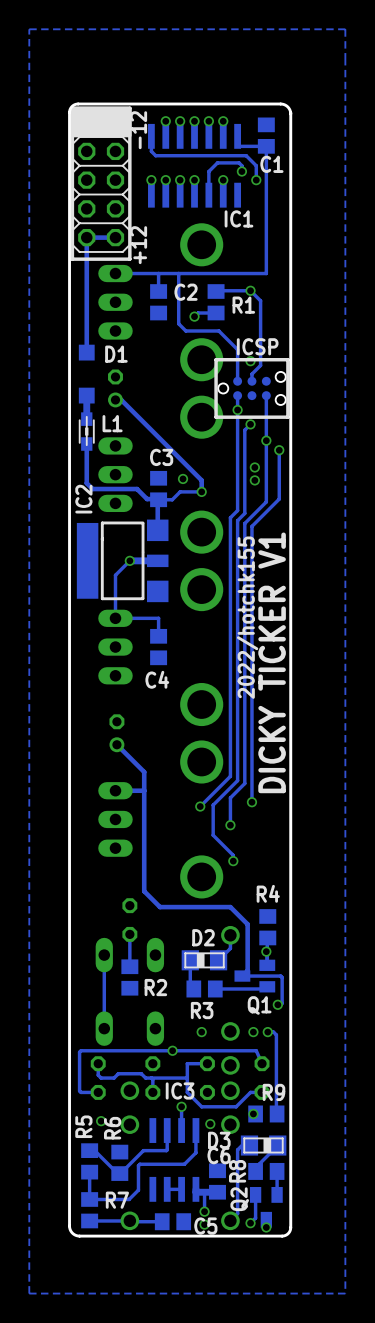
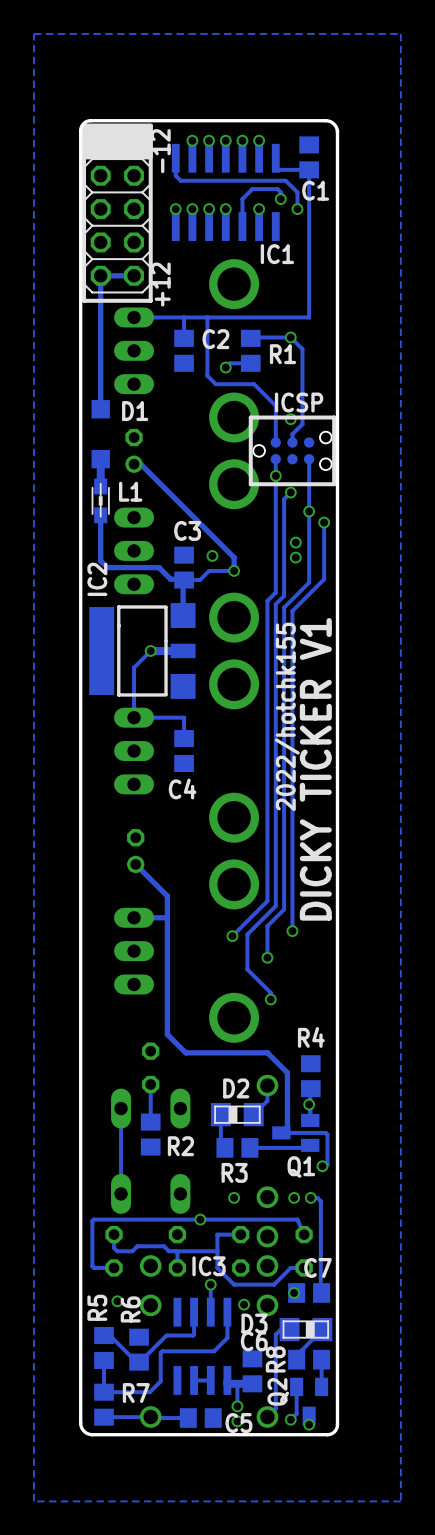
R9 name: R9 (273, 1092) -> C7 (318, 1267)

